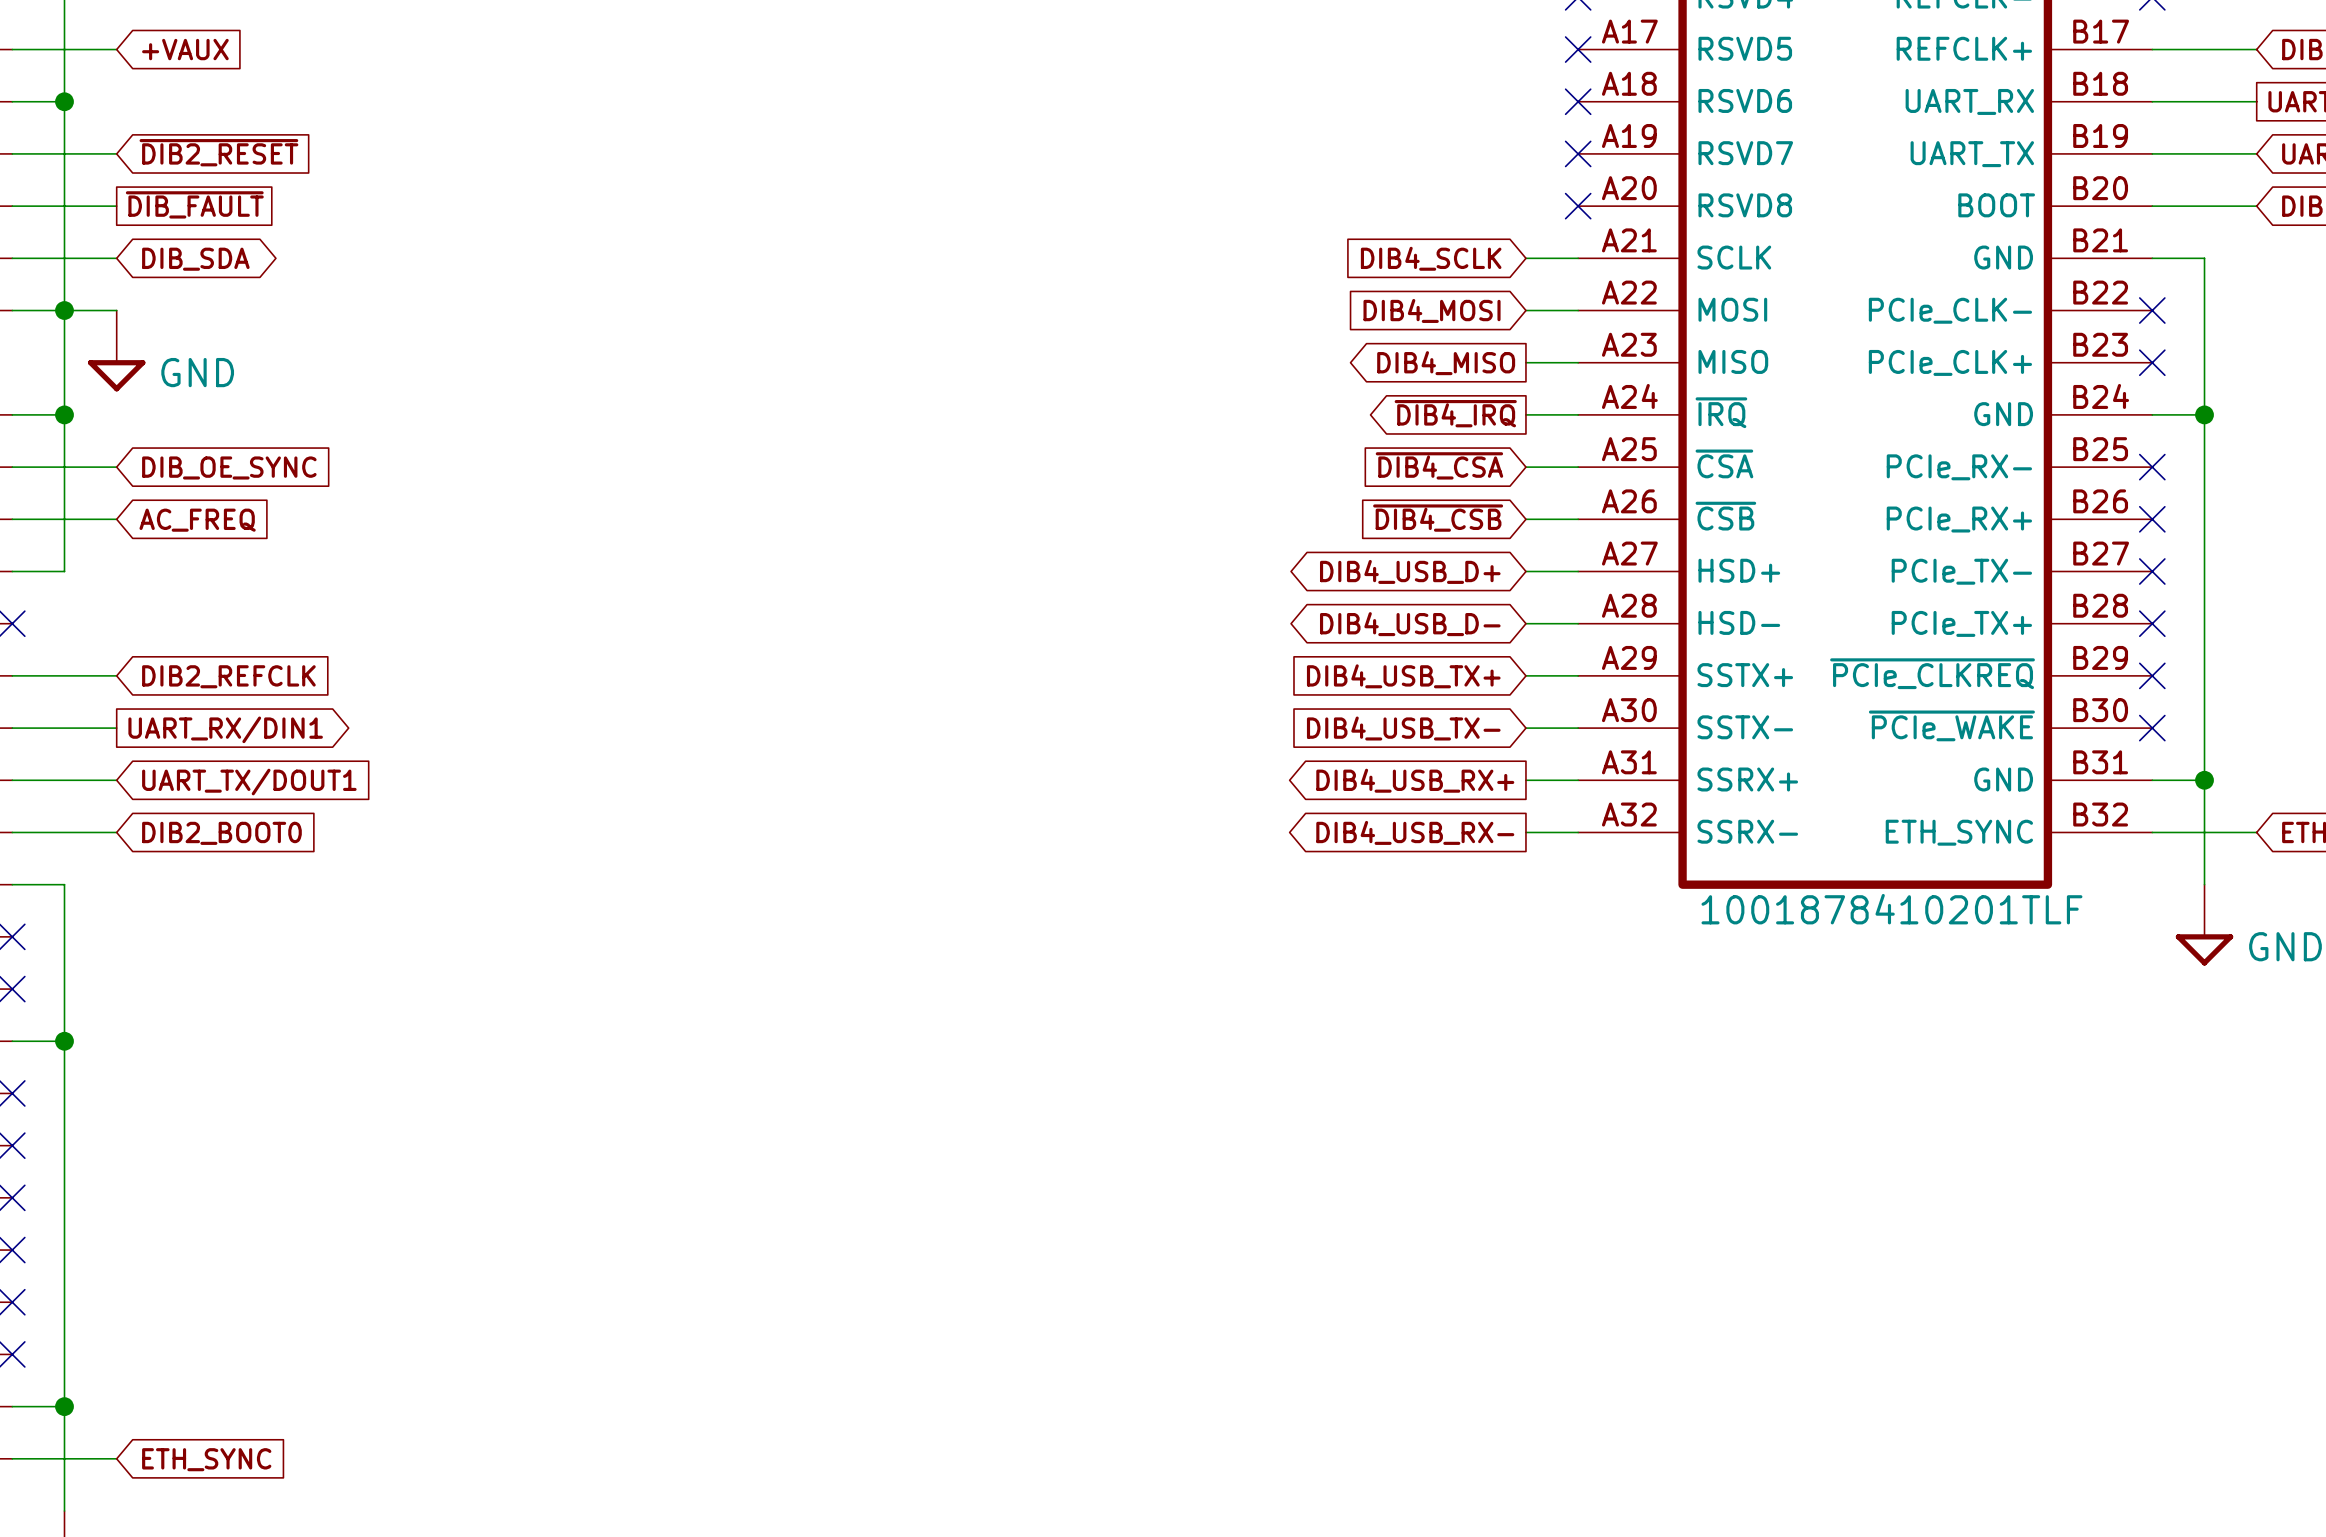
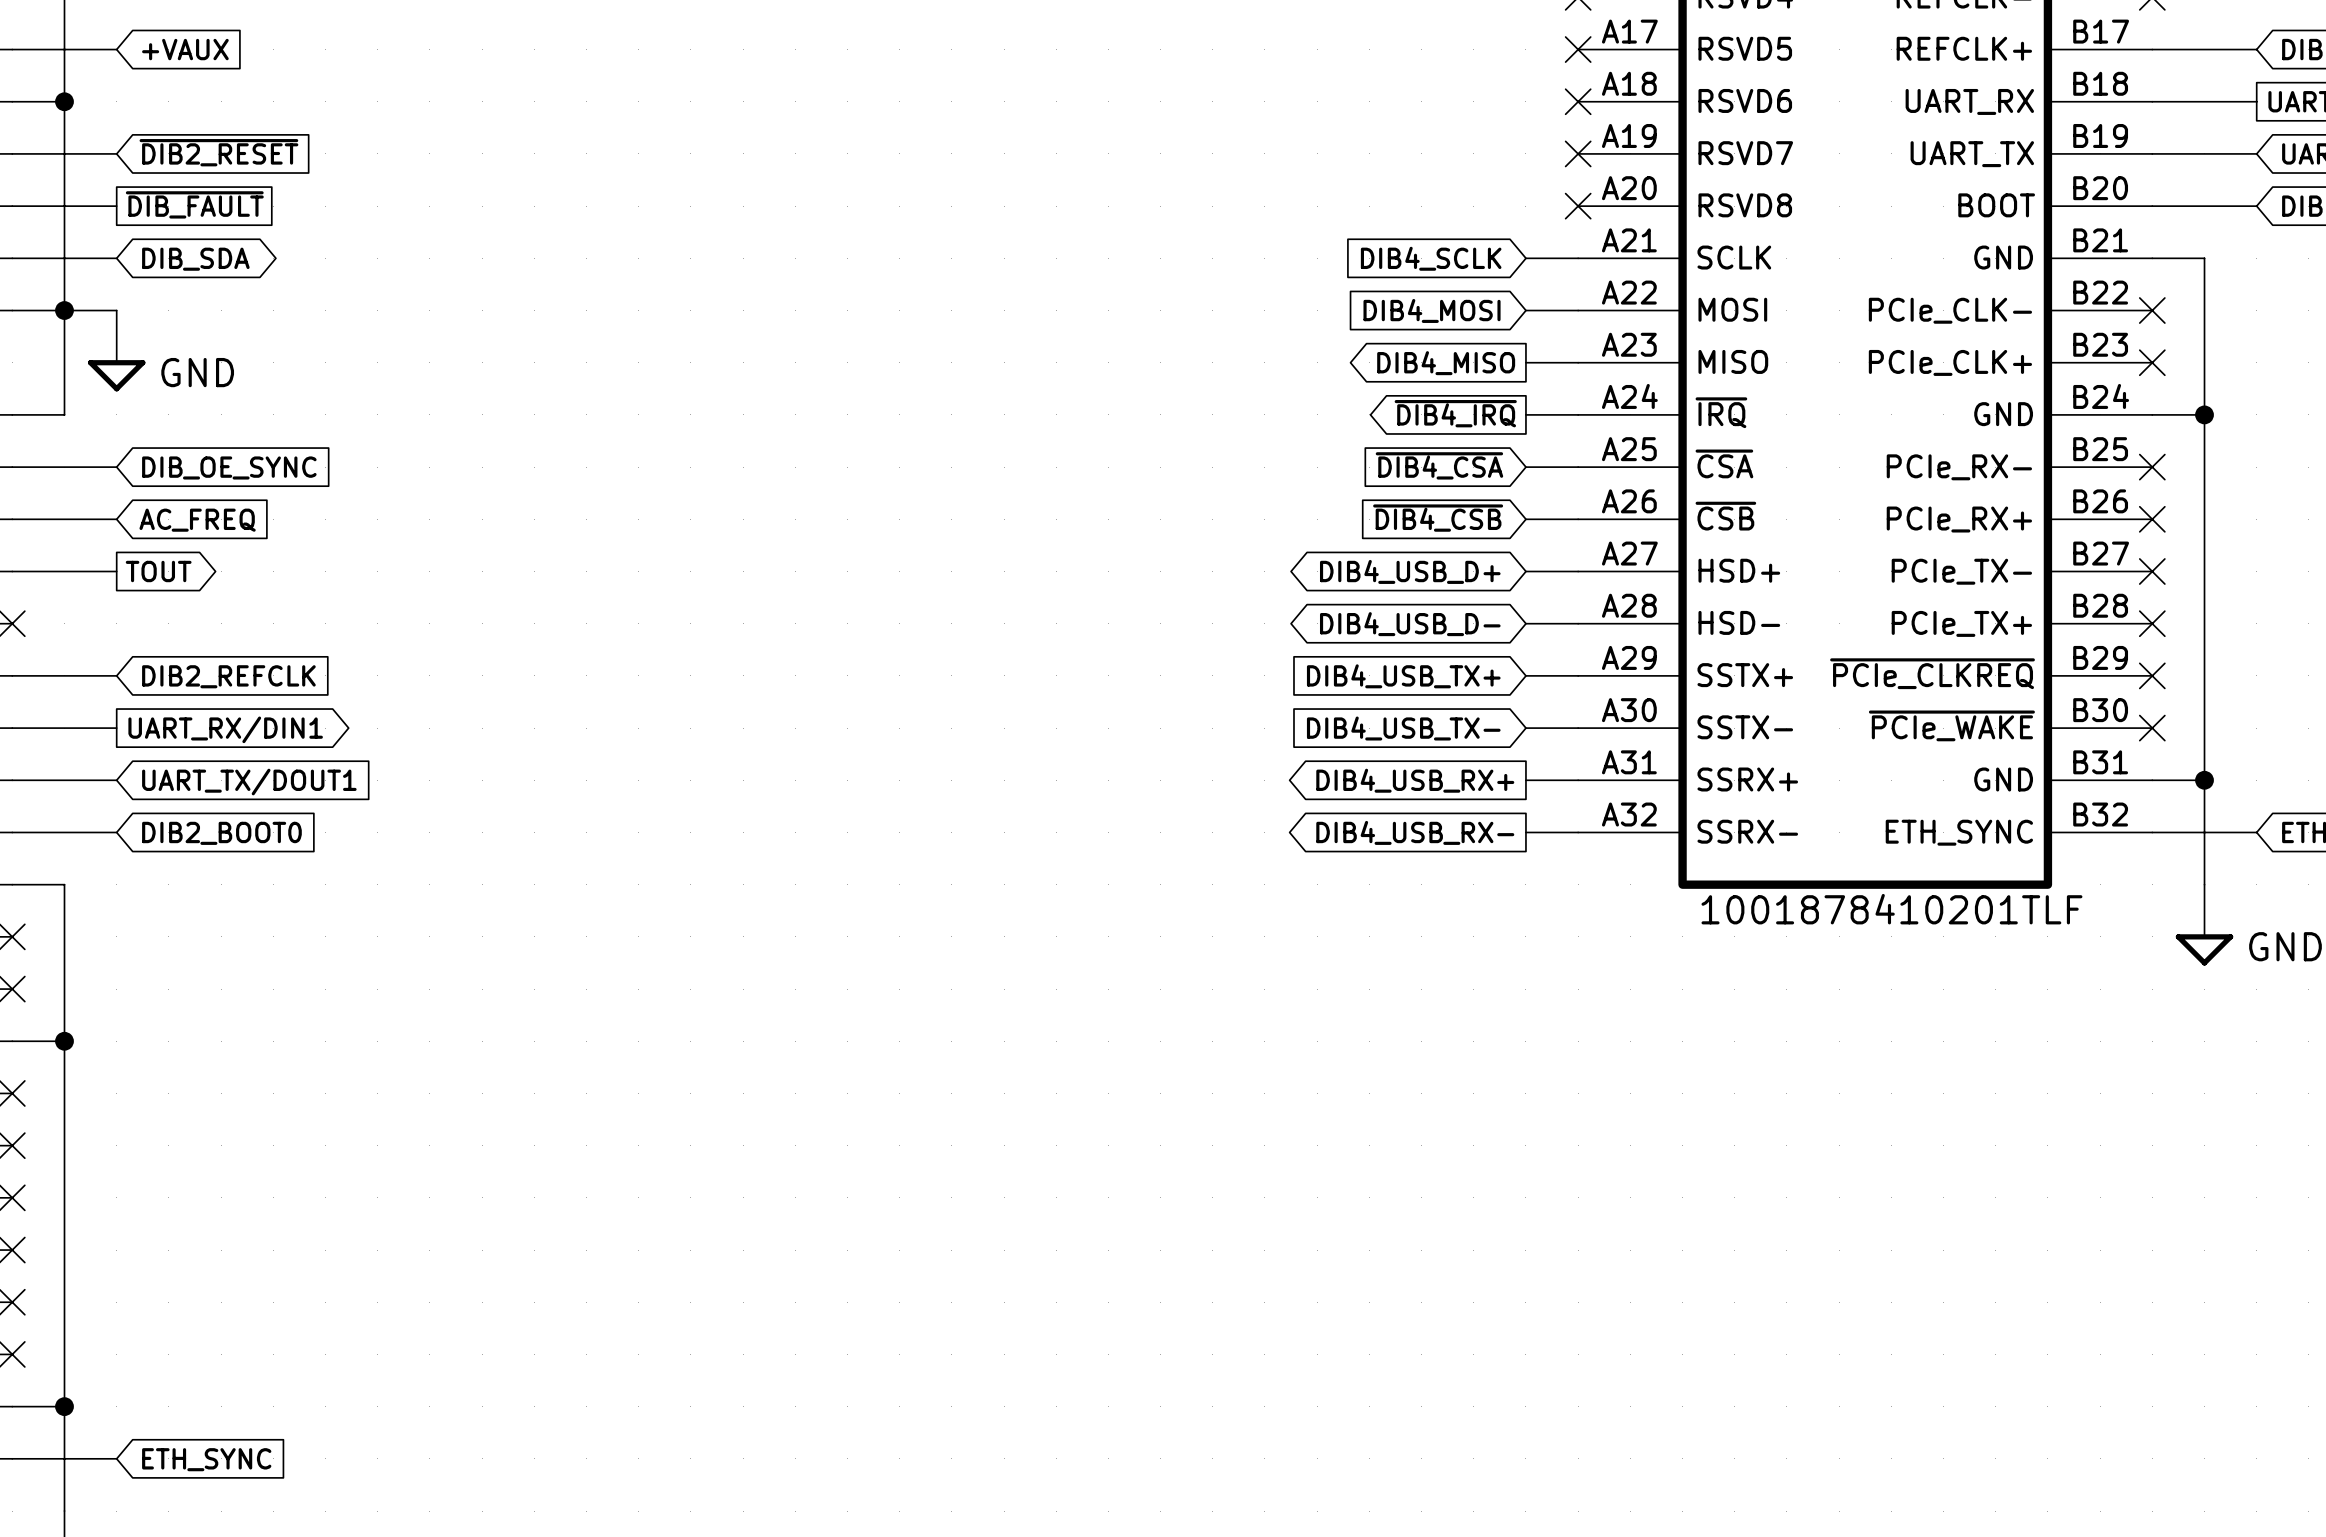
wire: (64, 414) (64, 571) -> (116, 571) (64, 571)
junction: (64, 414) -> none
global label: none -> TOUT (158, 571)

